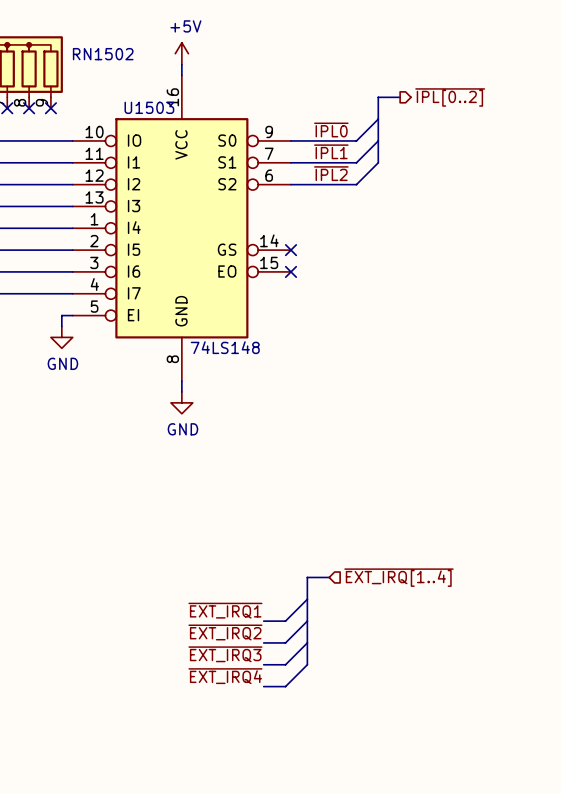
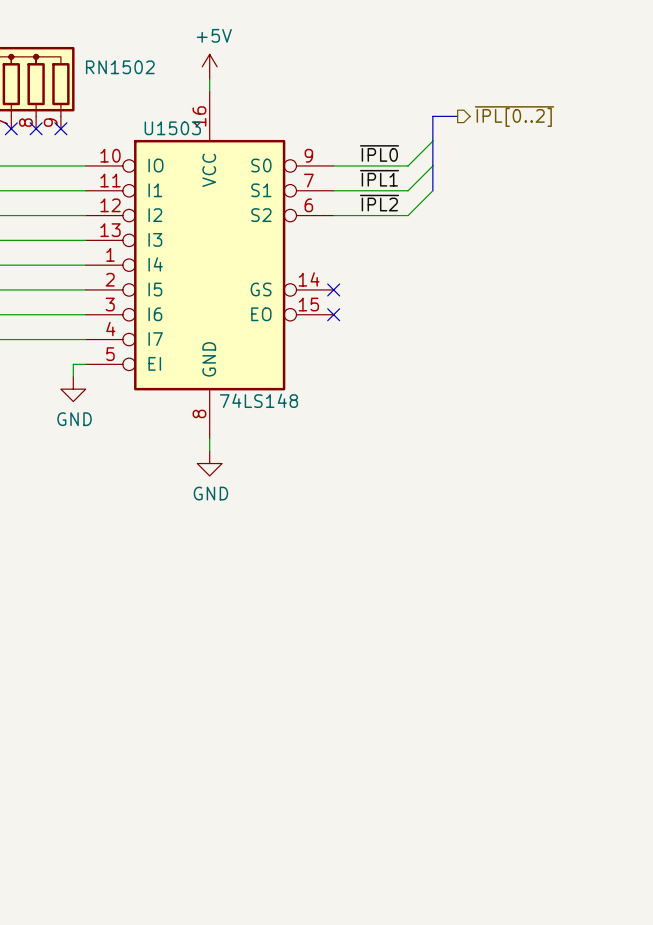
bus: (329, 577) (307, 577) (307, 664) -> none
hierarchical label: ~{EXT_IRQ[1..4]} (398, 577) -> none
wire: (307, 599) (285, 621) (263, 621) -> none
label: ~{EXT_IRQ1} (225, 610) -> none
wire: (307, 621) (285, 642) (263, 642) -> none
label: ~{EXT_IRQ2} (225, 632) -> none
wire: (307, 642) (285, 664) (263, 664) -> none
label: ~{EXT_IRQ3} (225, 654) -> none
wire: (307, 664) (285, 686) (263, 686) -> none
label: ~{EXT_IRQ4} (225, 676) -> none

